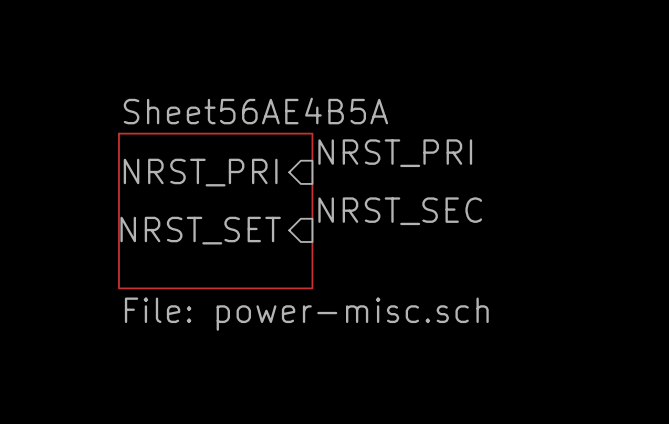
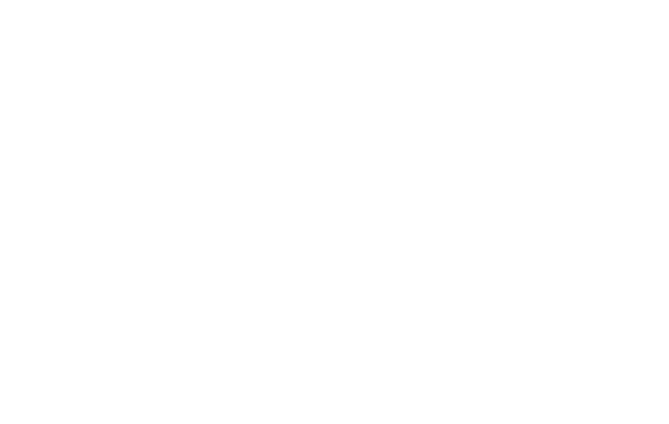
label: NRST_PRI (395, 153) -> none
sheet pin: NRST_PRI (200, 172) -> none
sheet Sheet56AE4B5A: File: power-misc.sch (215, 211) -> none
label: NRST_SEC (400, 211) -> none
sheet pin: NRST_SET (200, 230) -> none

